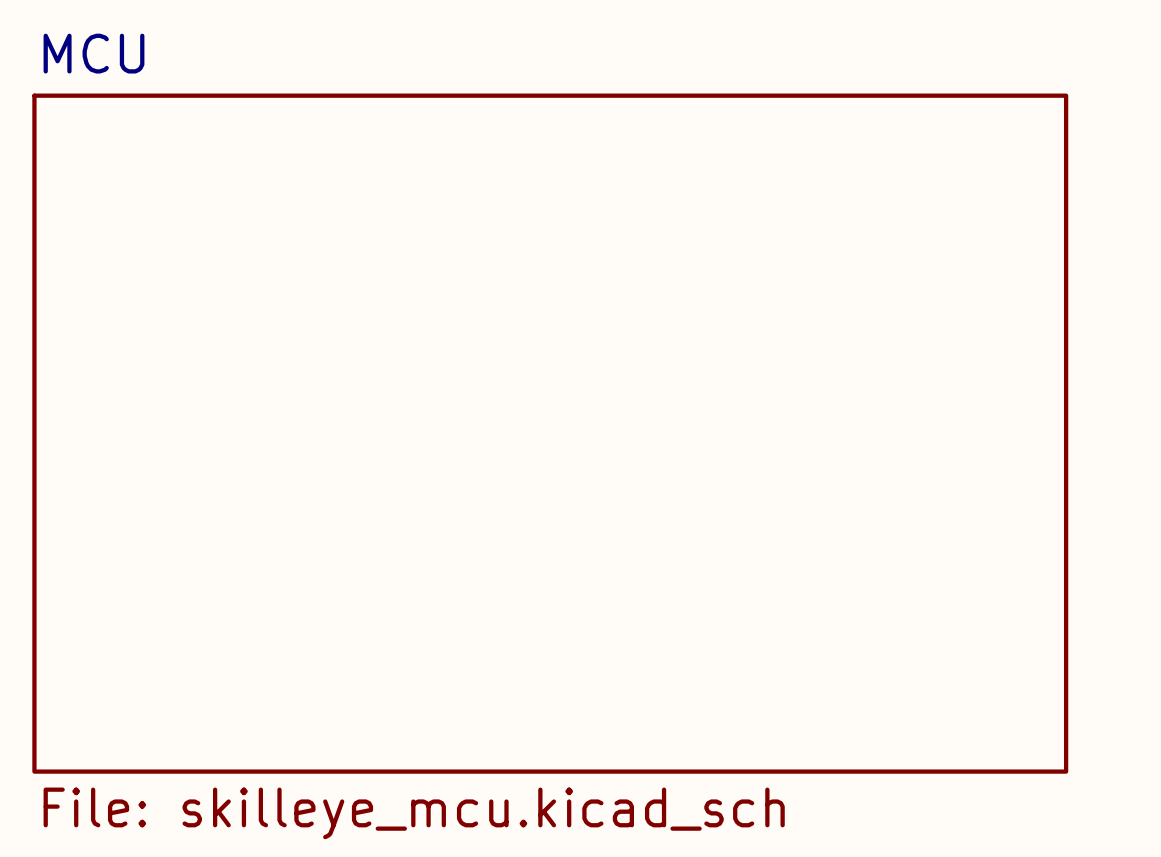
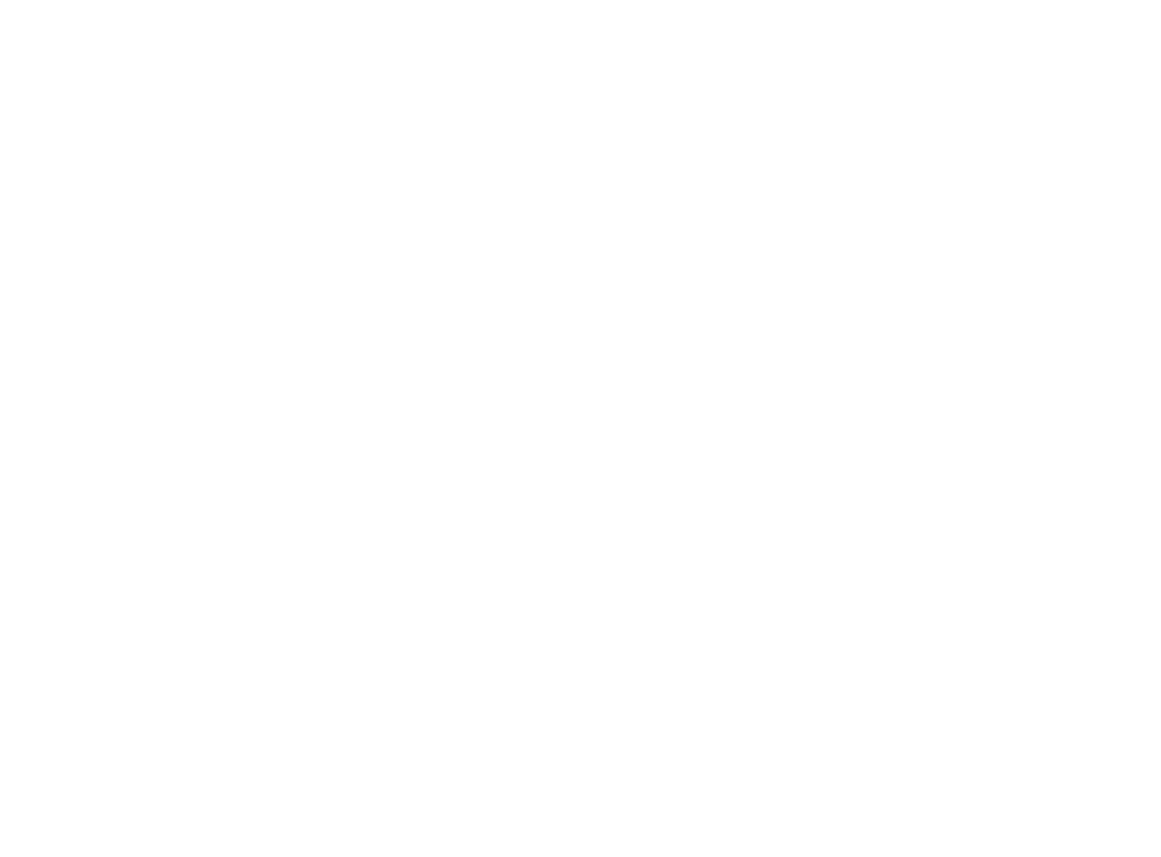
sheet MCU: File: skilleye_mcu.kicad_sch (550, 433) -> none

